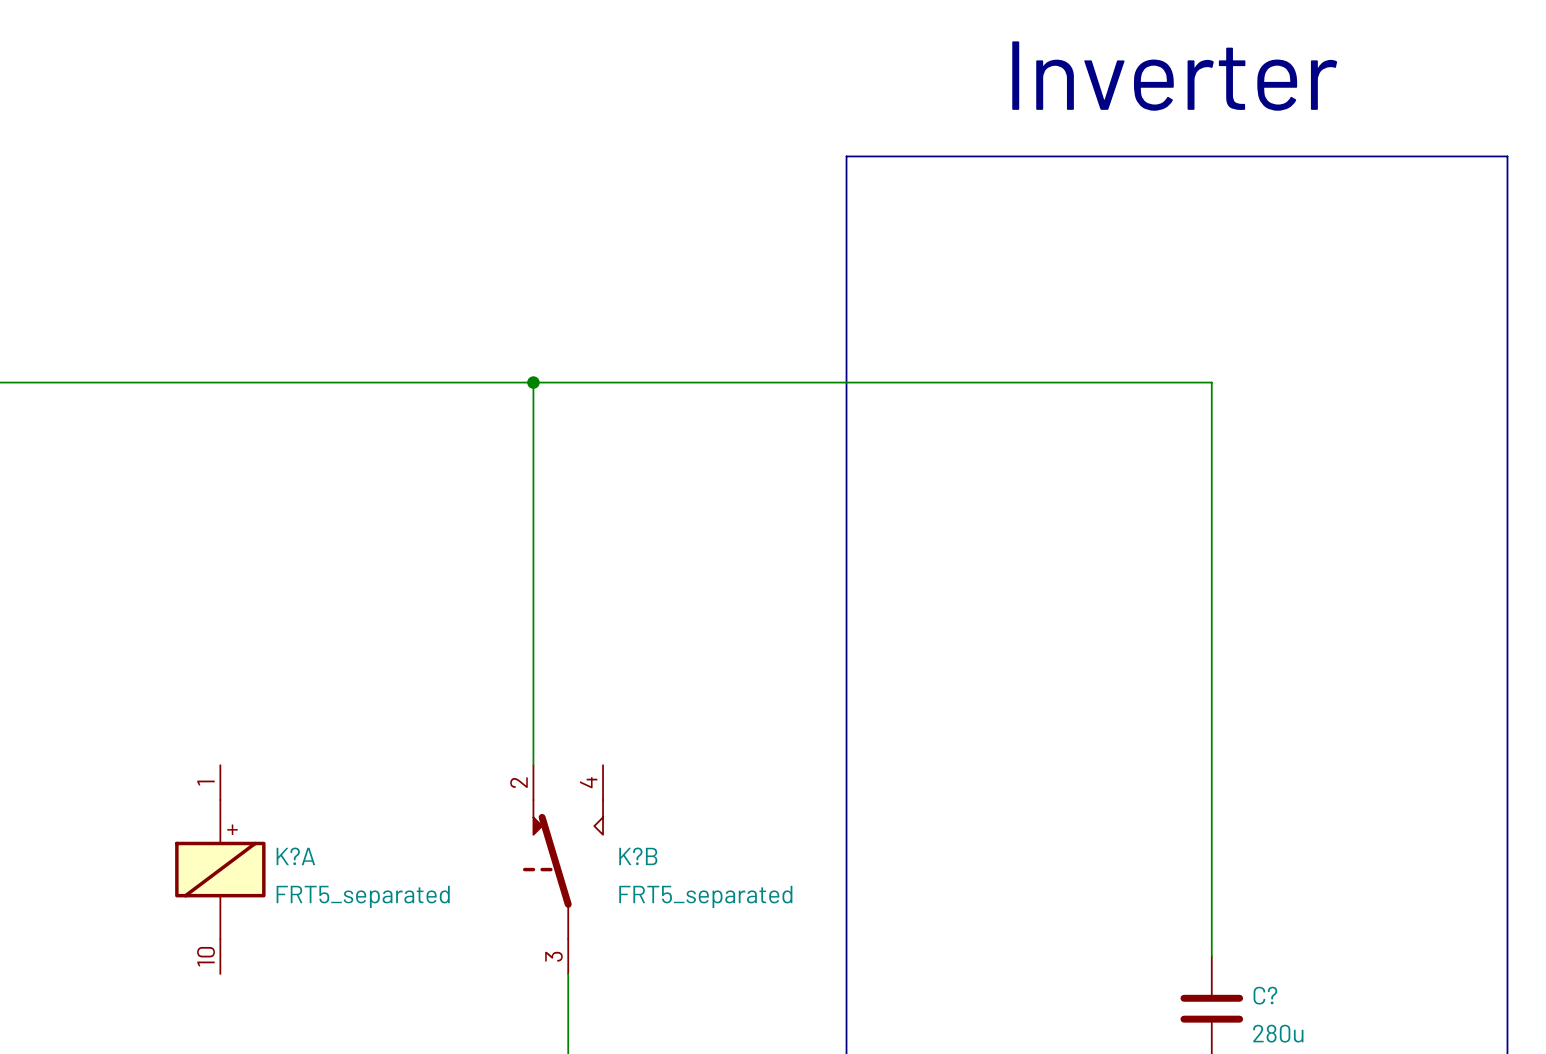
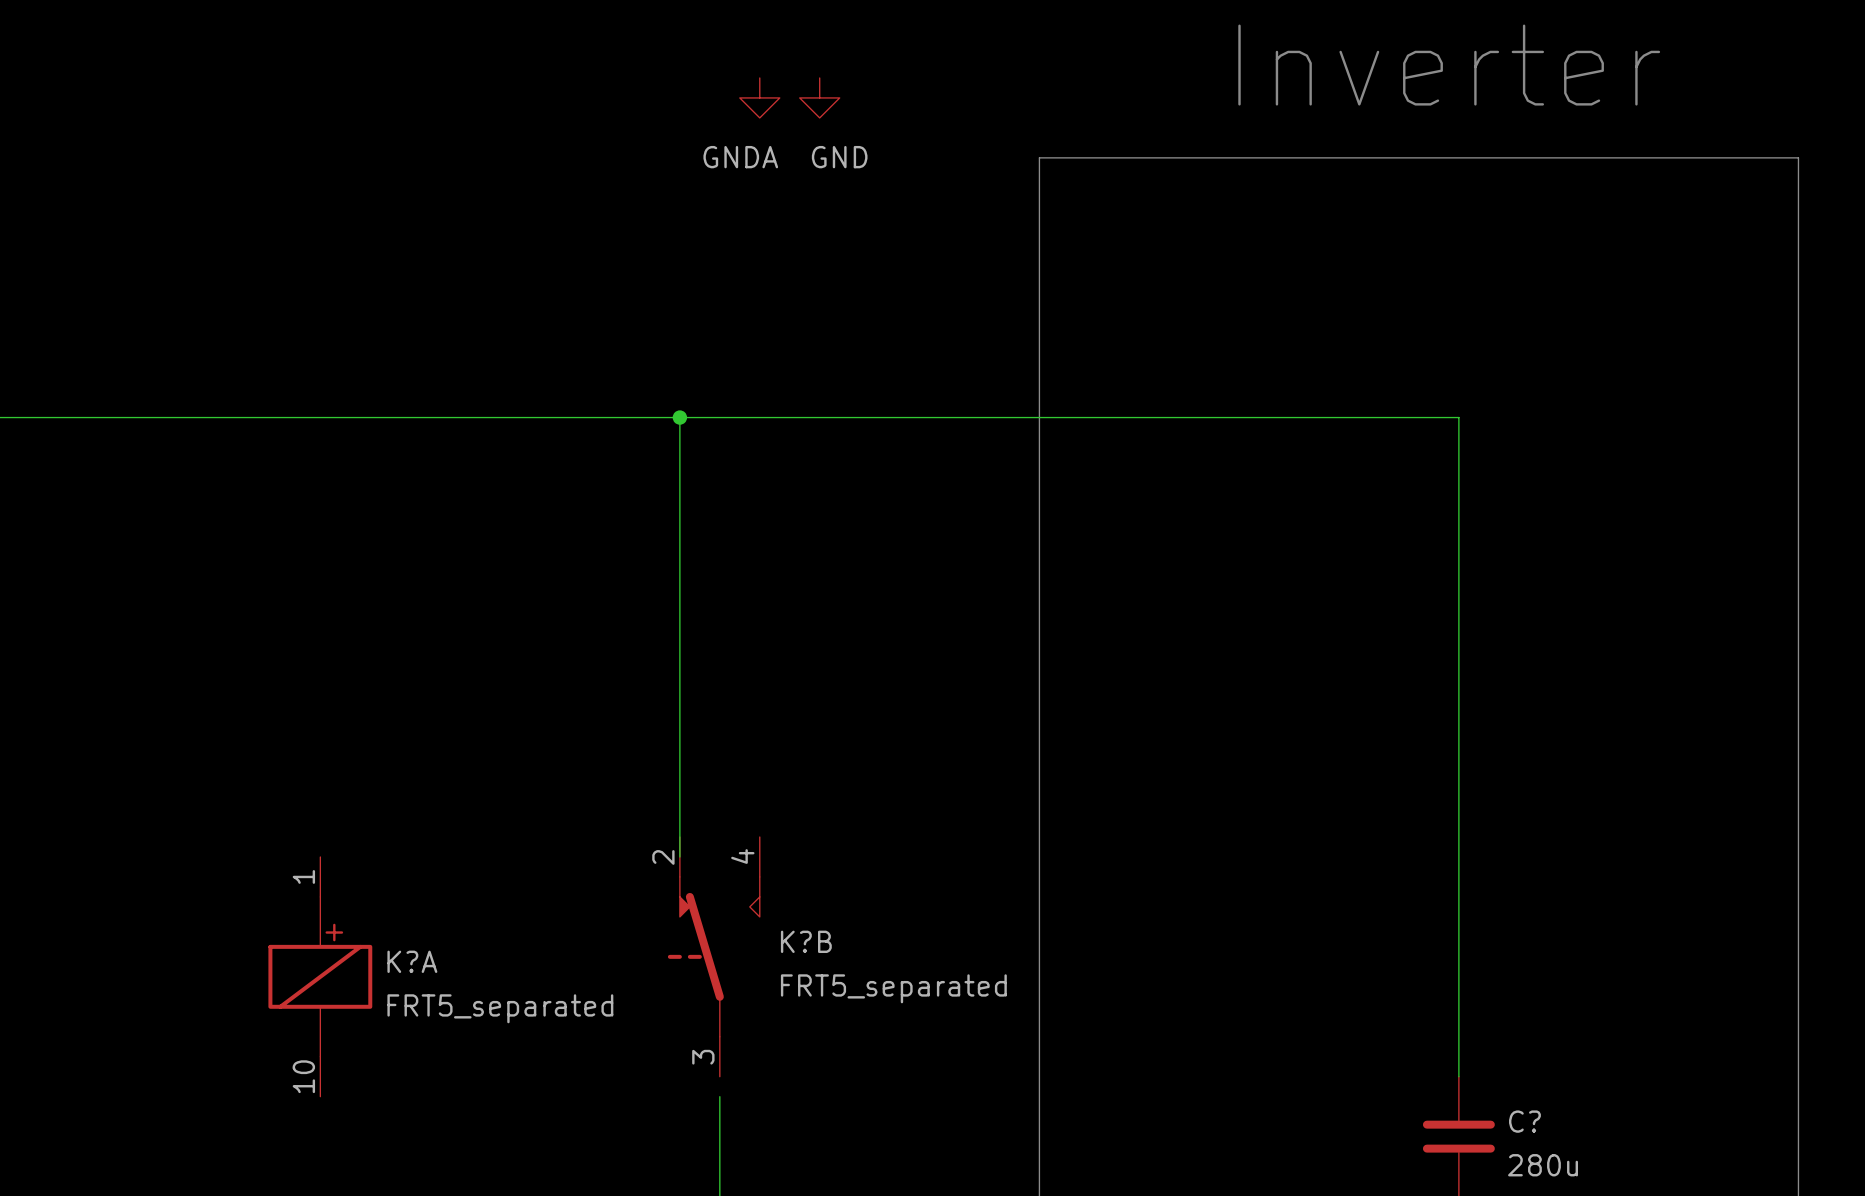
power symbol: none -> GNDA (759, 97)
power symbol: none -> GND (819, 97)
K?B position: (563, 869) -> (713, 956)

